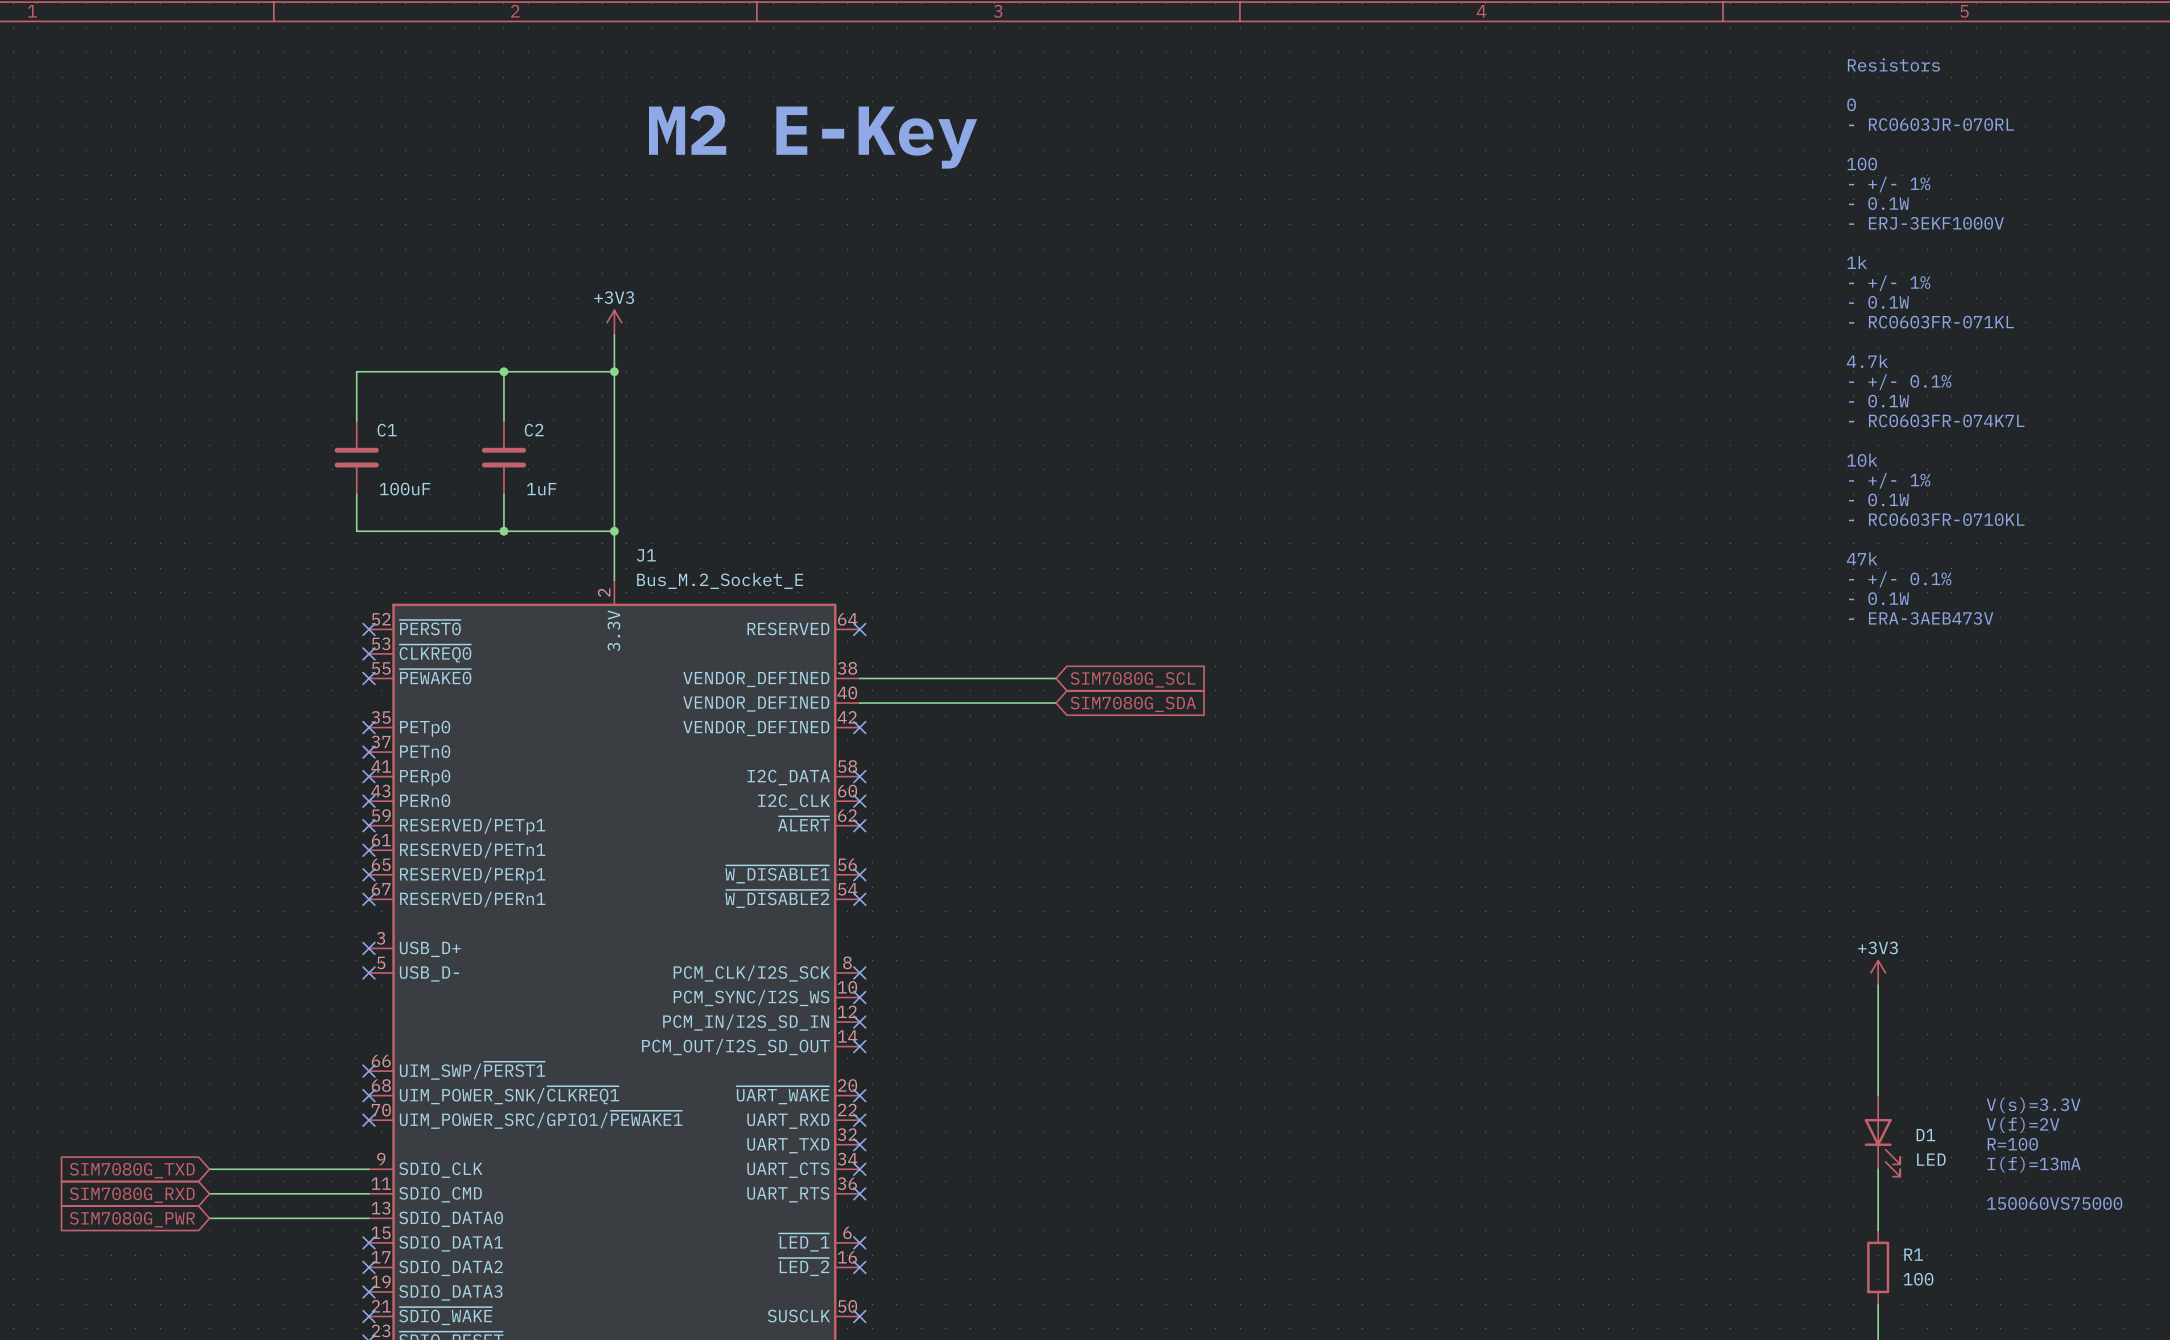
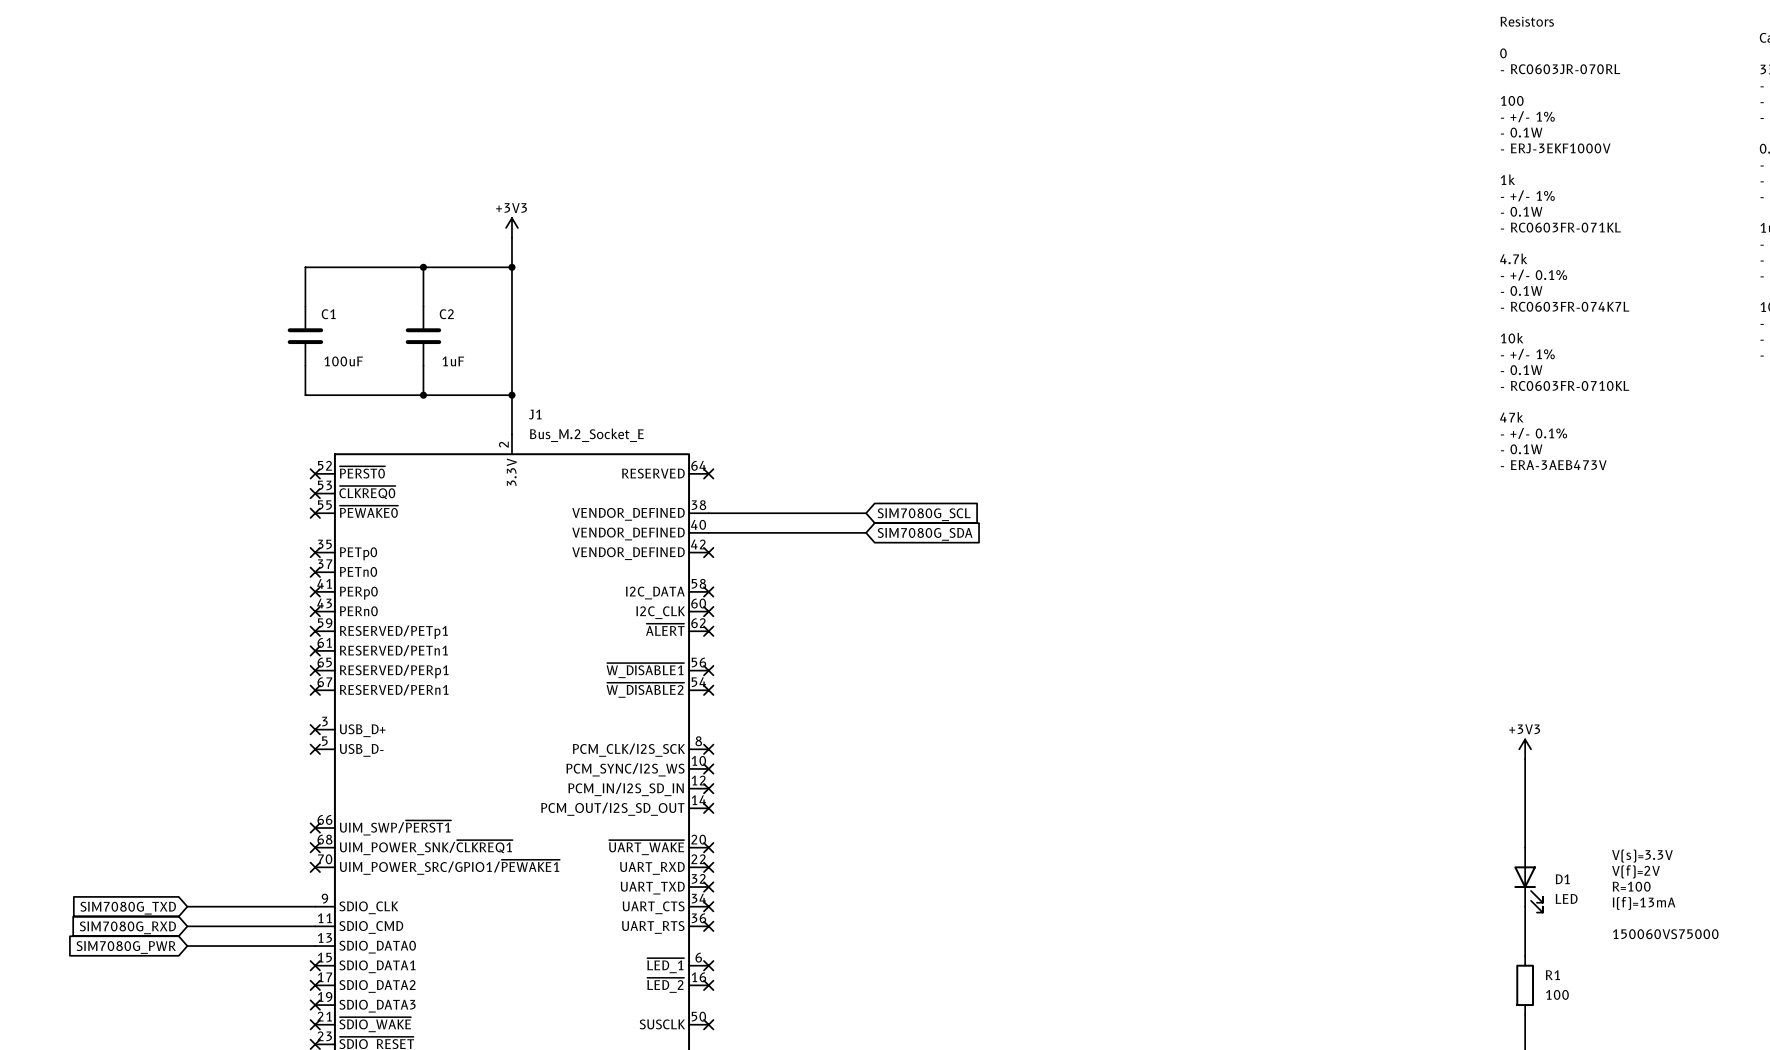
text: M2 E-Key (813, 137) -> none

